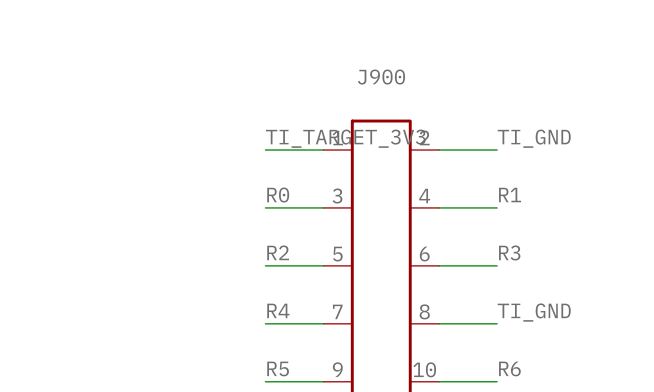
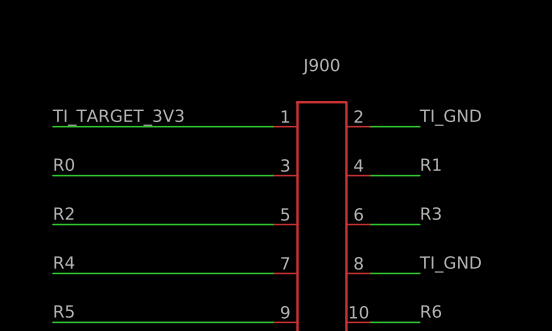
label position: TI_TARGET_3V3 (345, 138) -> TI_TARGET_3V3 (118, 117)
wire: none -> (52, 126) (224, 126)
label position: R0 (278, 195) -> R0 (64, 164)
wire: none -> (52, 175) (224, 175)
label position: R2 (278, 252) -> R2 (63, 213)
wire: none -> (52, 224) (224, 224)
label position: R4 (278, 310) -> R4 (64, 262)
wire: none -> (52, 273) (224, 273)
label position: R5 (278, 368) -> R5 (64, 311)
wire: none -> (52, 322) (224, 322)

